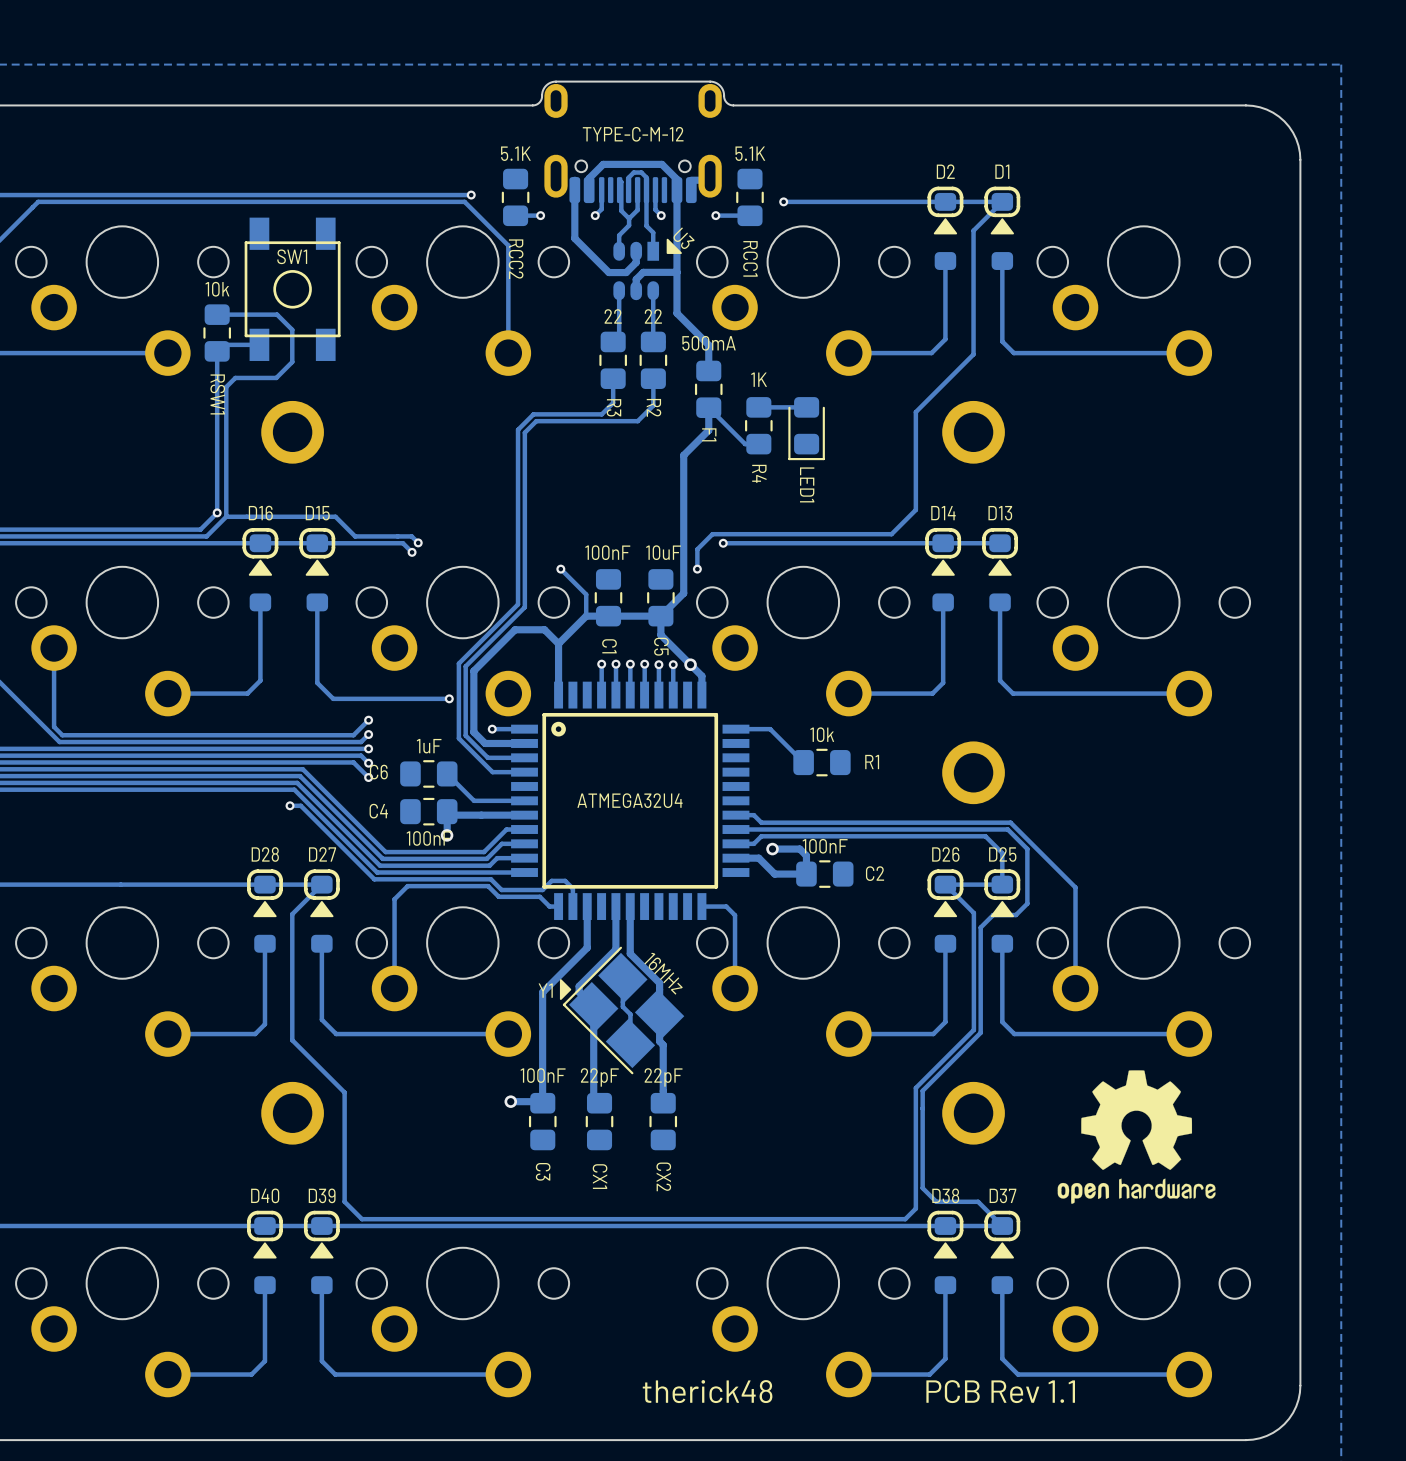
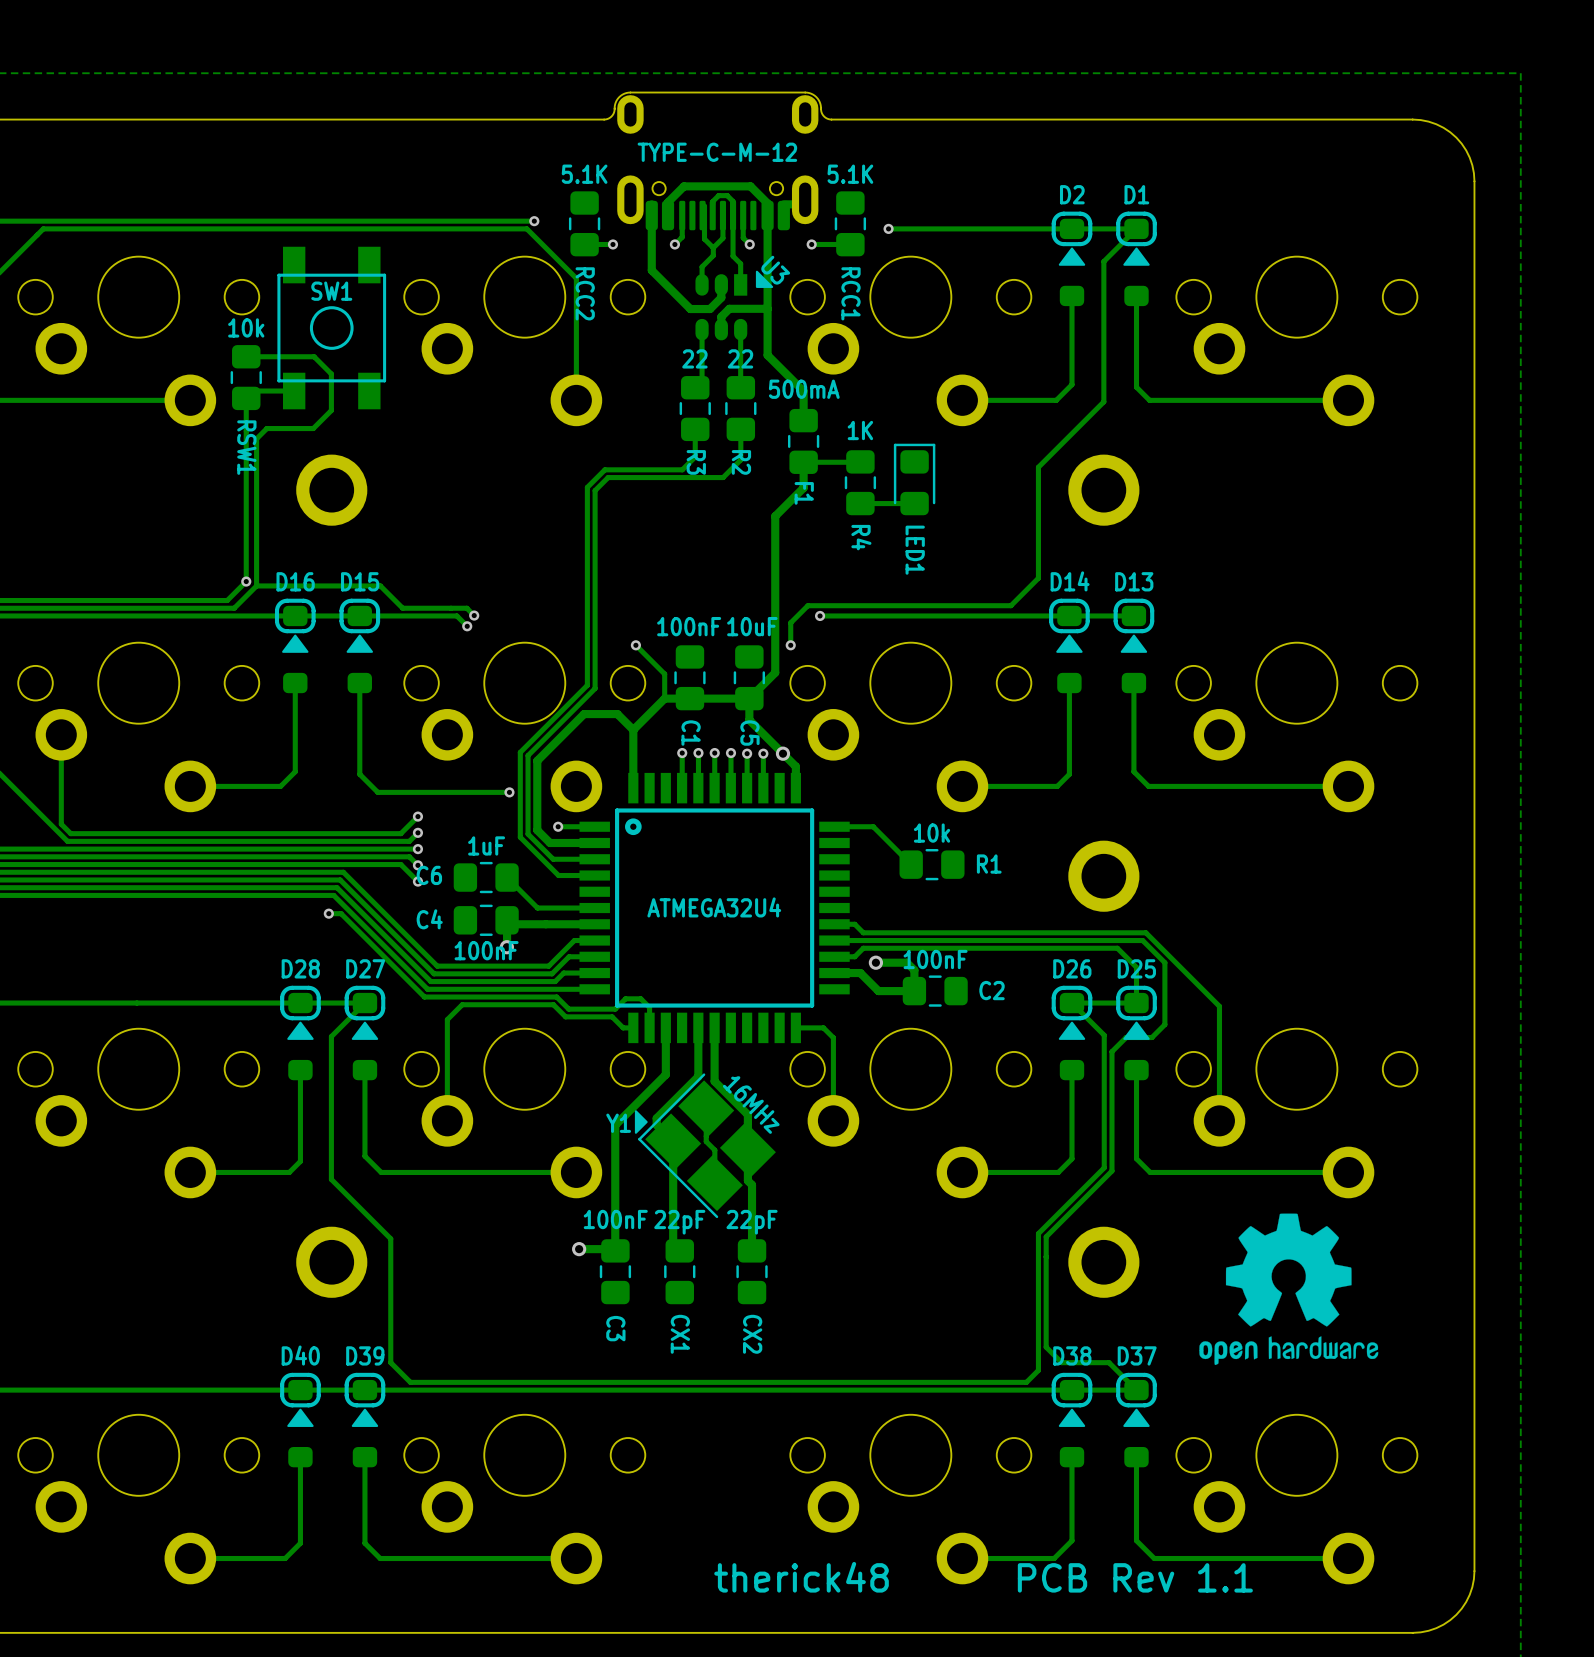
track: (708, 407) (745, 444) (758, 444) -> (803, 462) (862, 461)
track: (806, 407) (758, 407) -> none
LED1 rotation: 0° (806, 428) -> 180° (914, 479)
track: none -> (914, 503) (862, 503)

